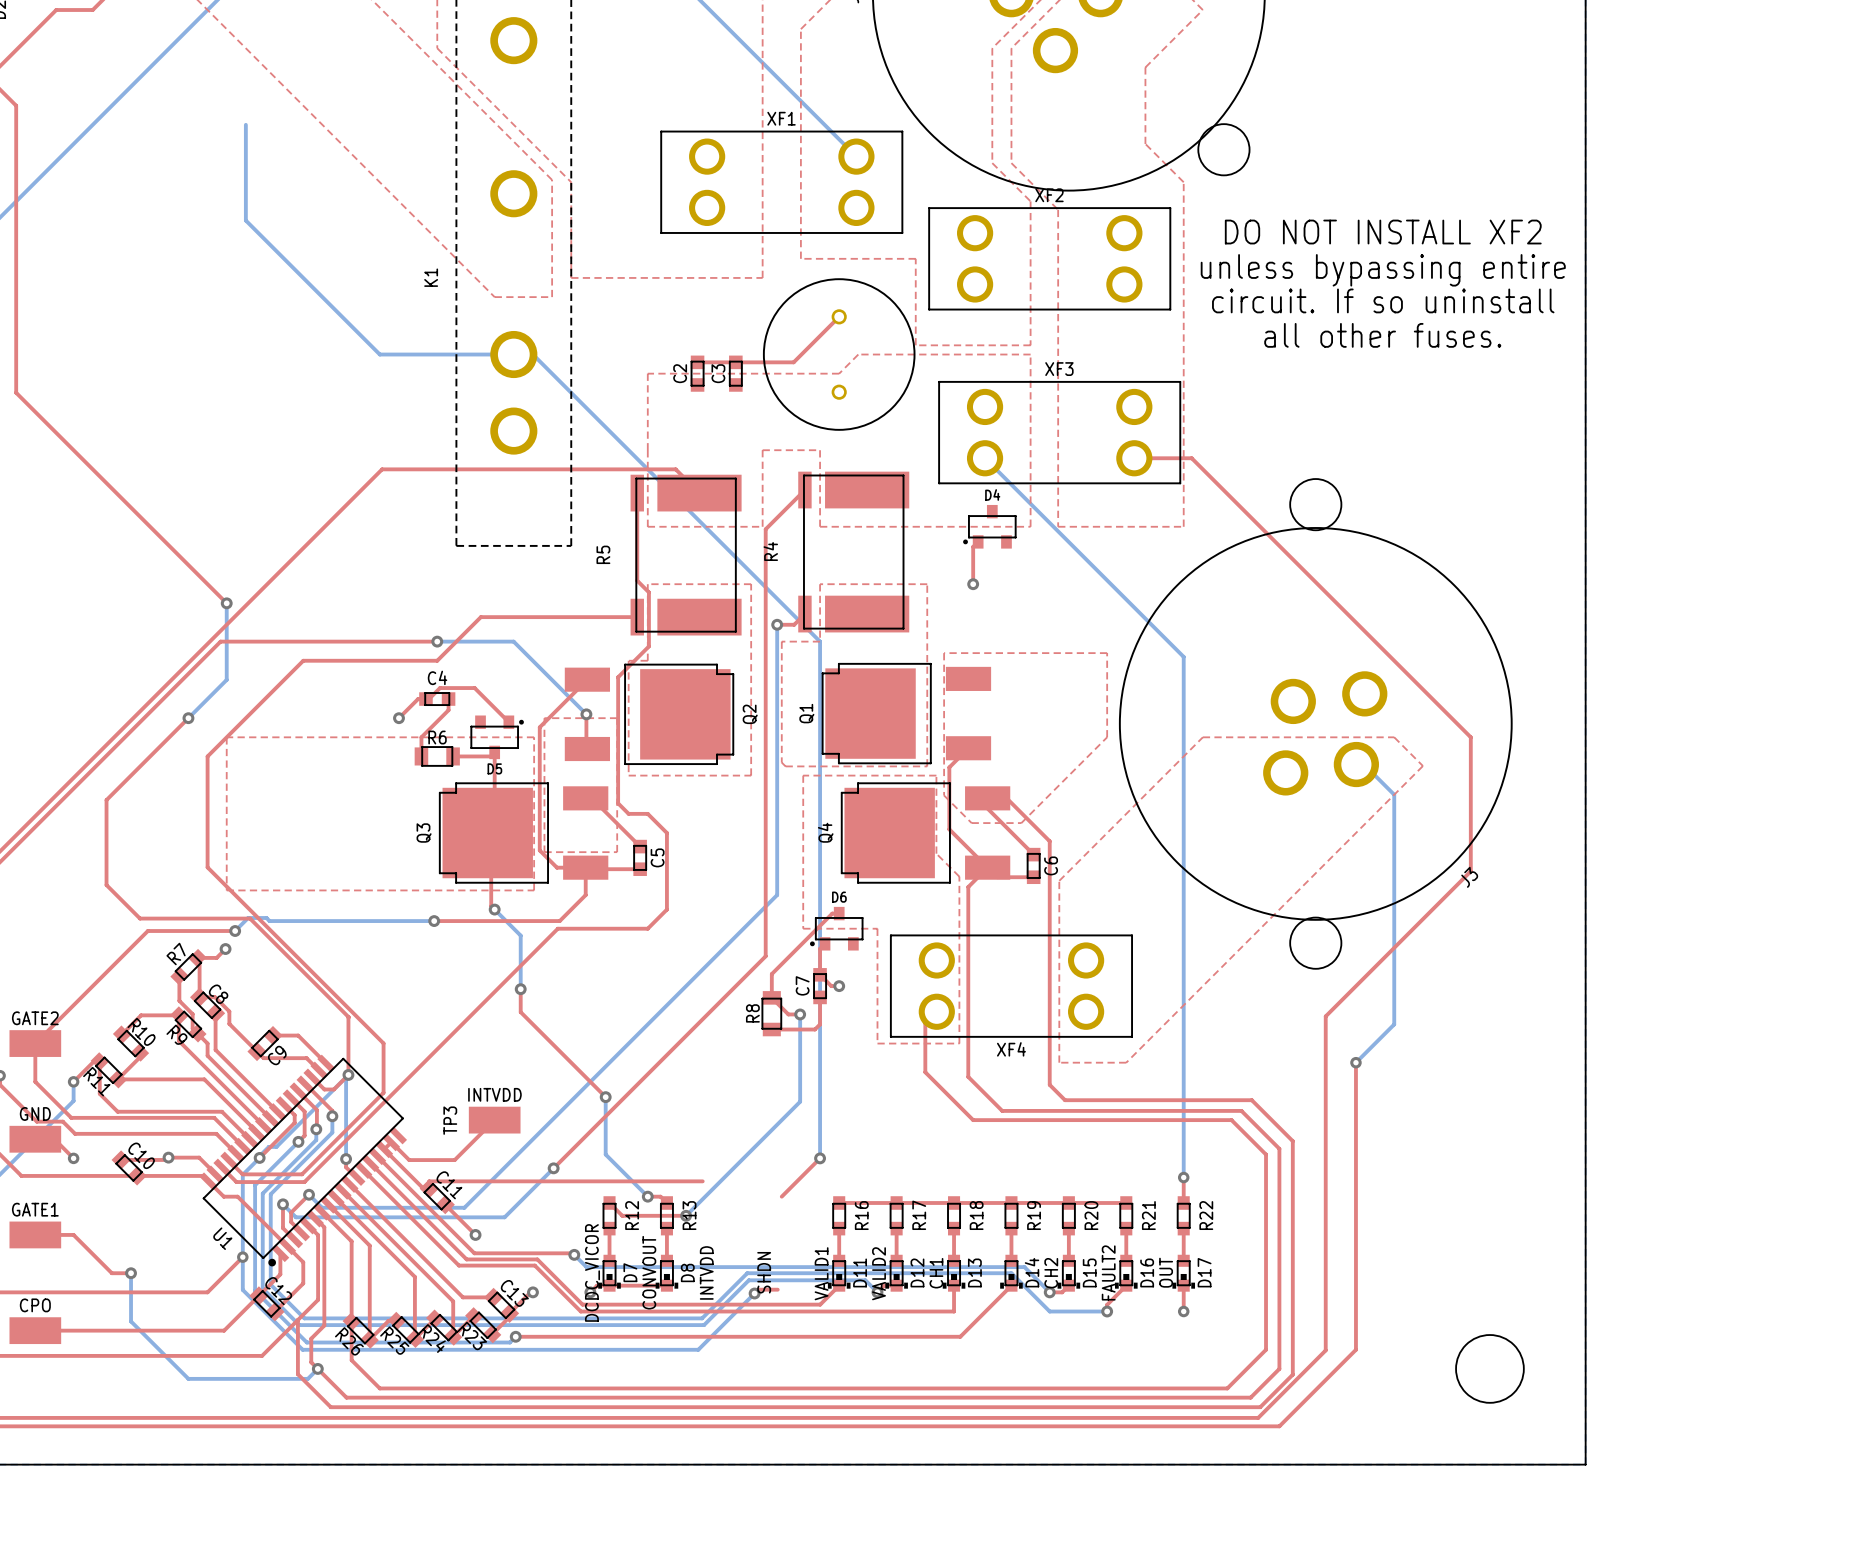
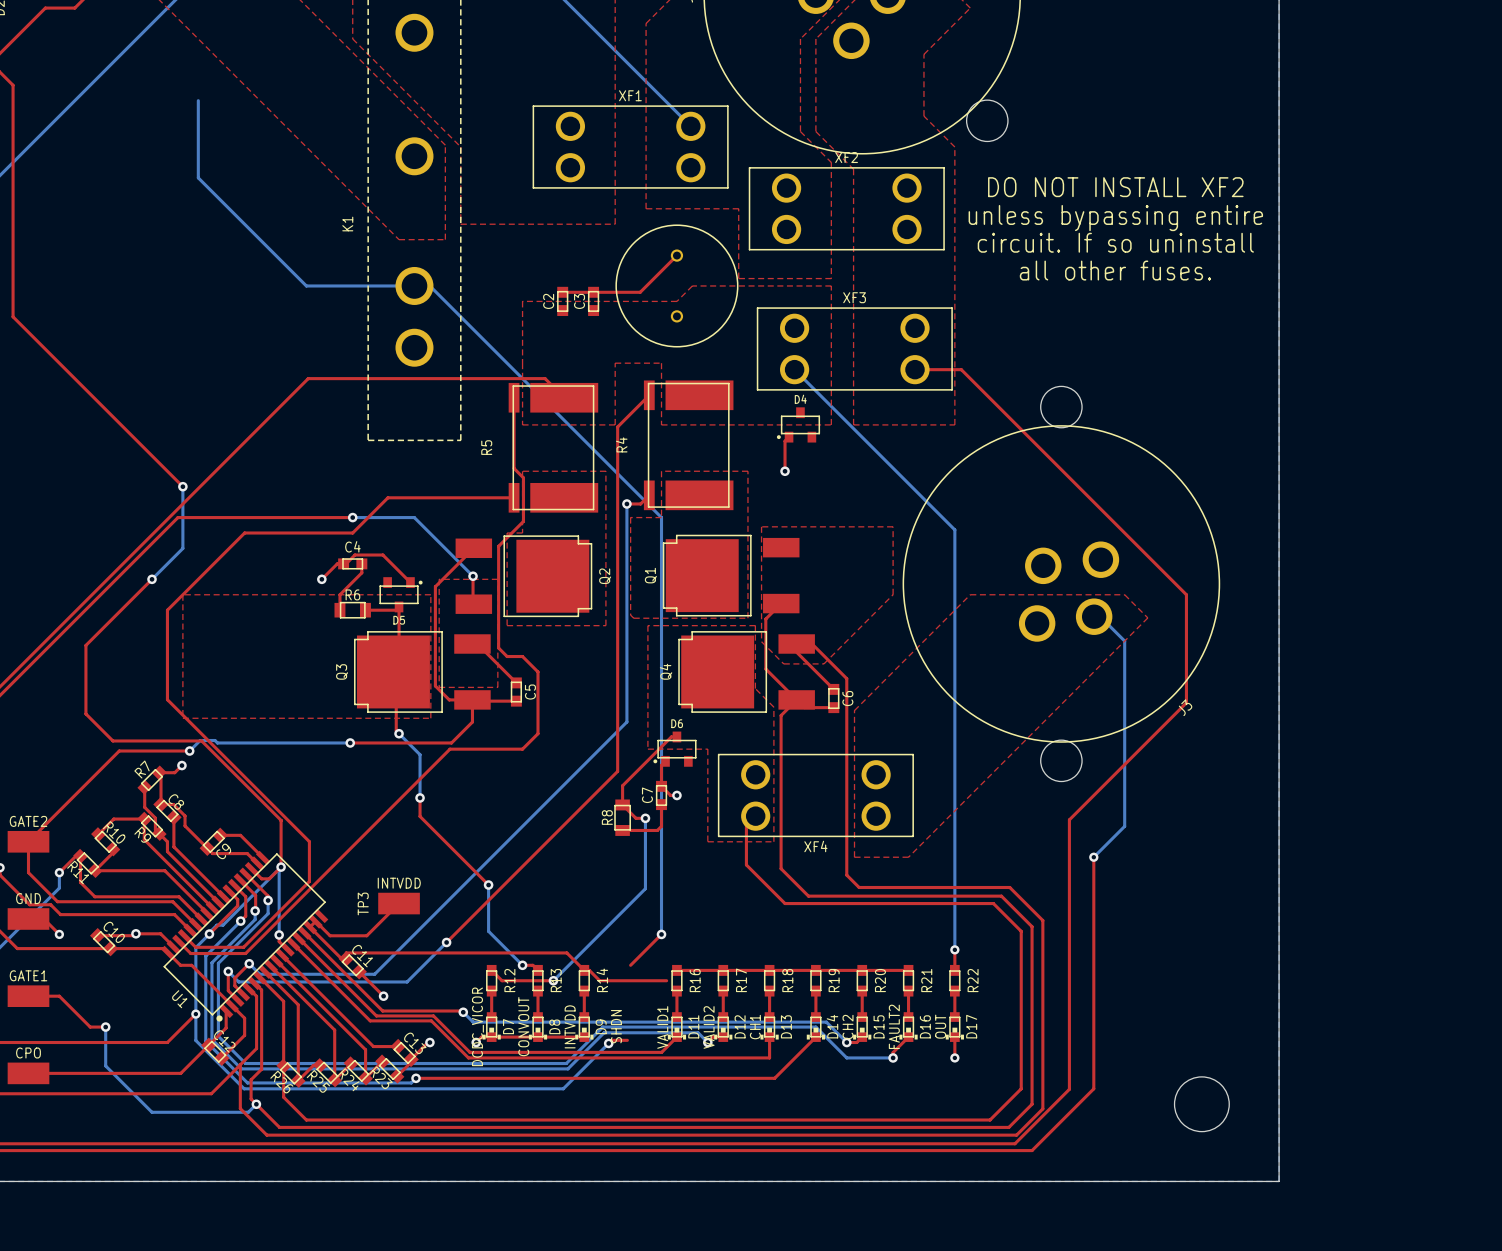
top track: none -> (566, 952) (584, 970) (589, 970) (599, 980) (666, 980)
R14: none -> (584, 980)
top track: none -> (584, 991) (584, 1017)
D9: none -> (584, 1027)
top track: none -> (537, 1037) (584, 1037)

